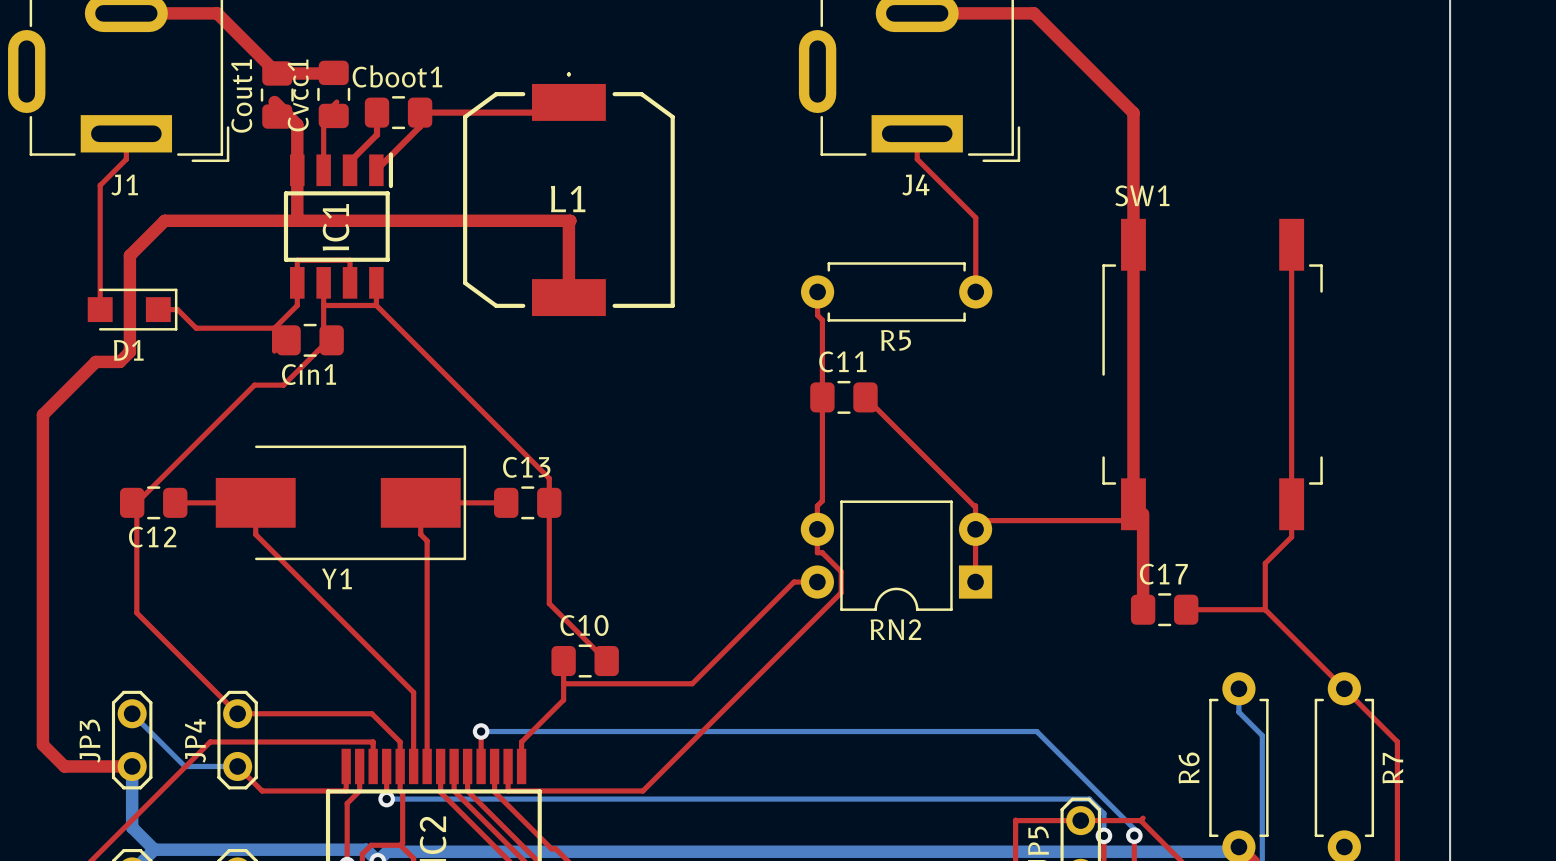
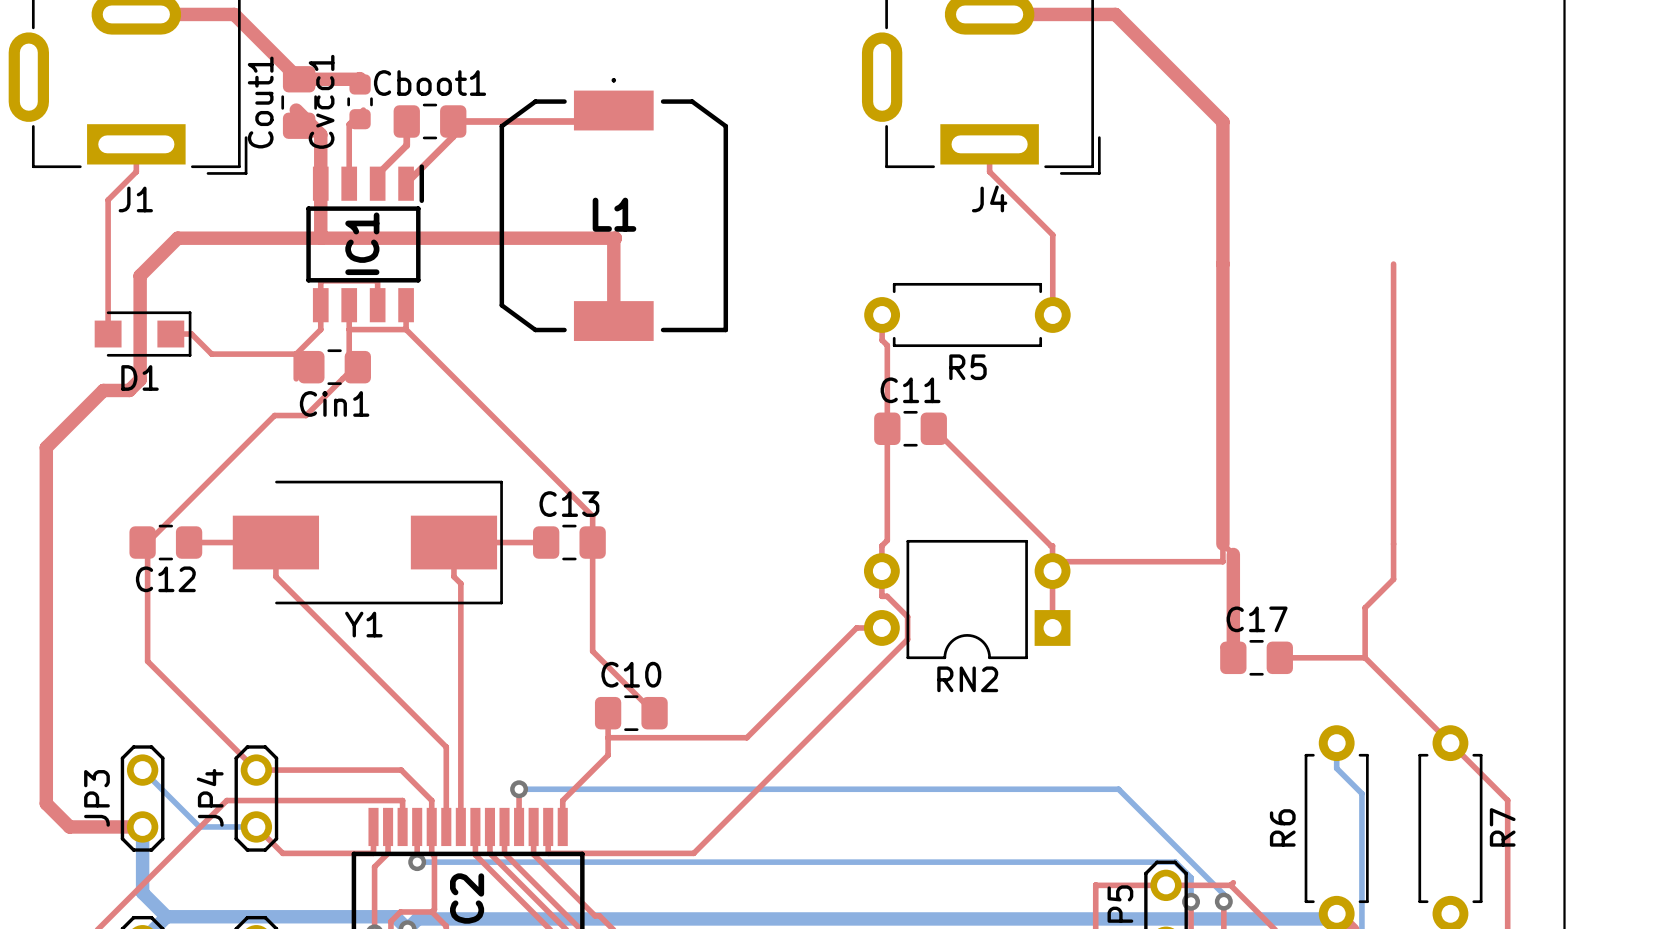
Cvcc1 footprint: [317, 60, 351, 129] -> [347, 74, 373, 130]
SW1: (1212, 374) -> none

